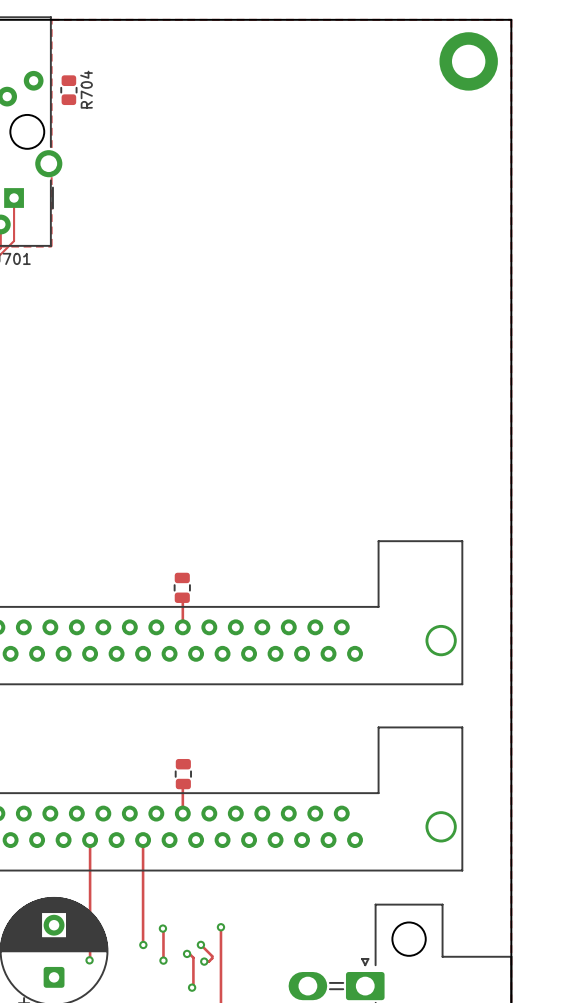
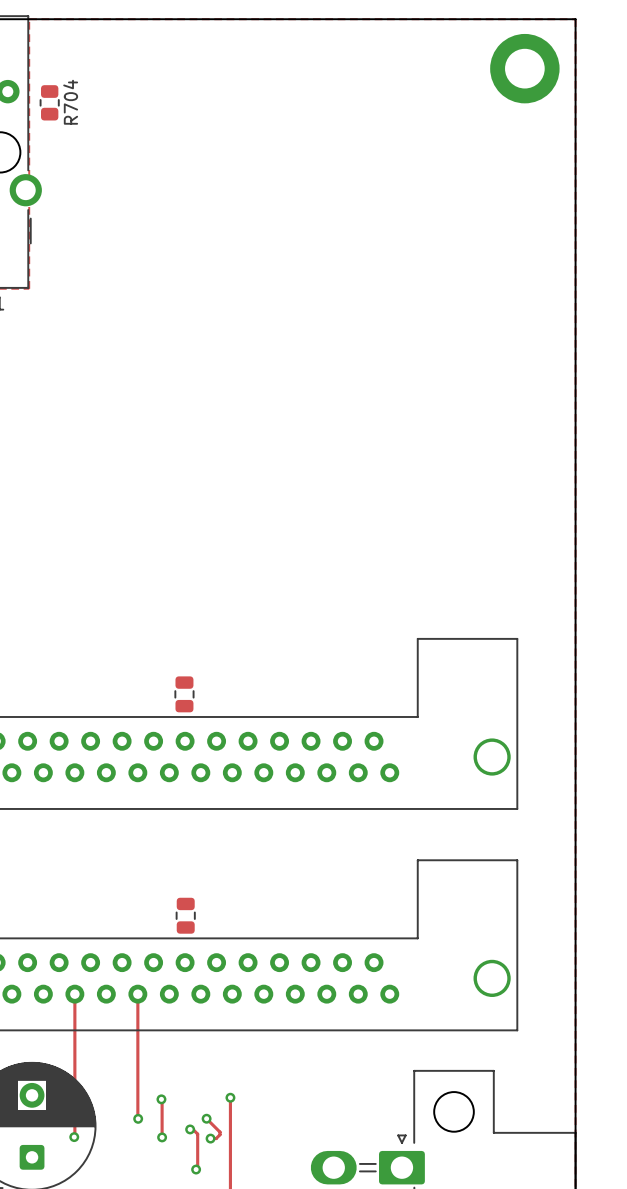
track: (182, 597) (182, 627) -> none
track: (183, 784) (182, 813) -> none

